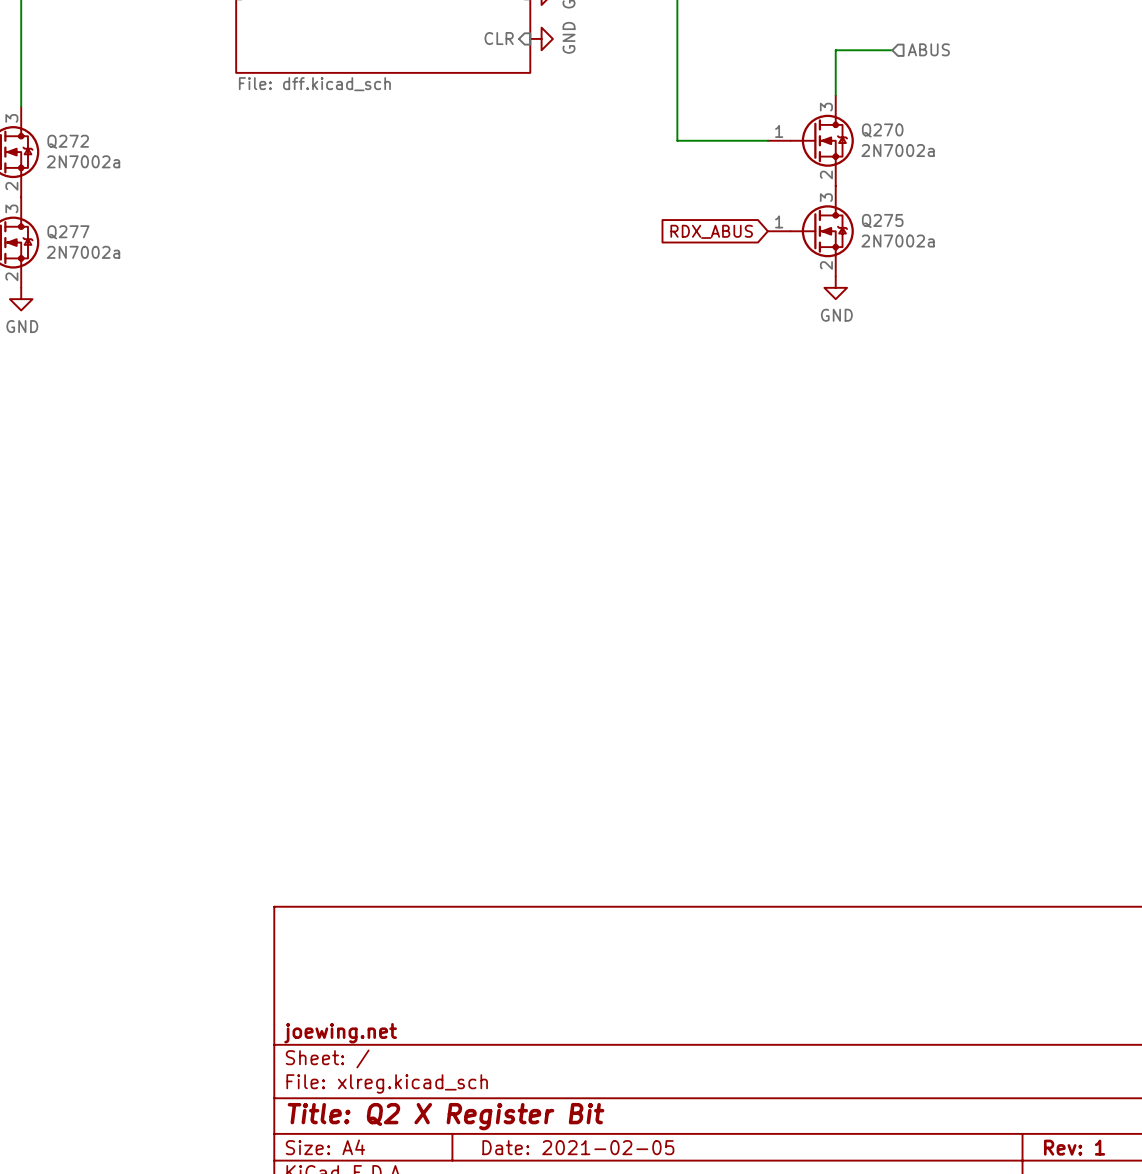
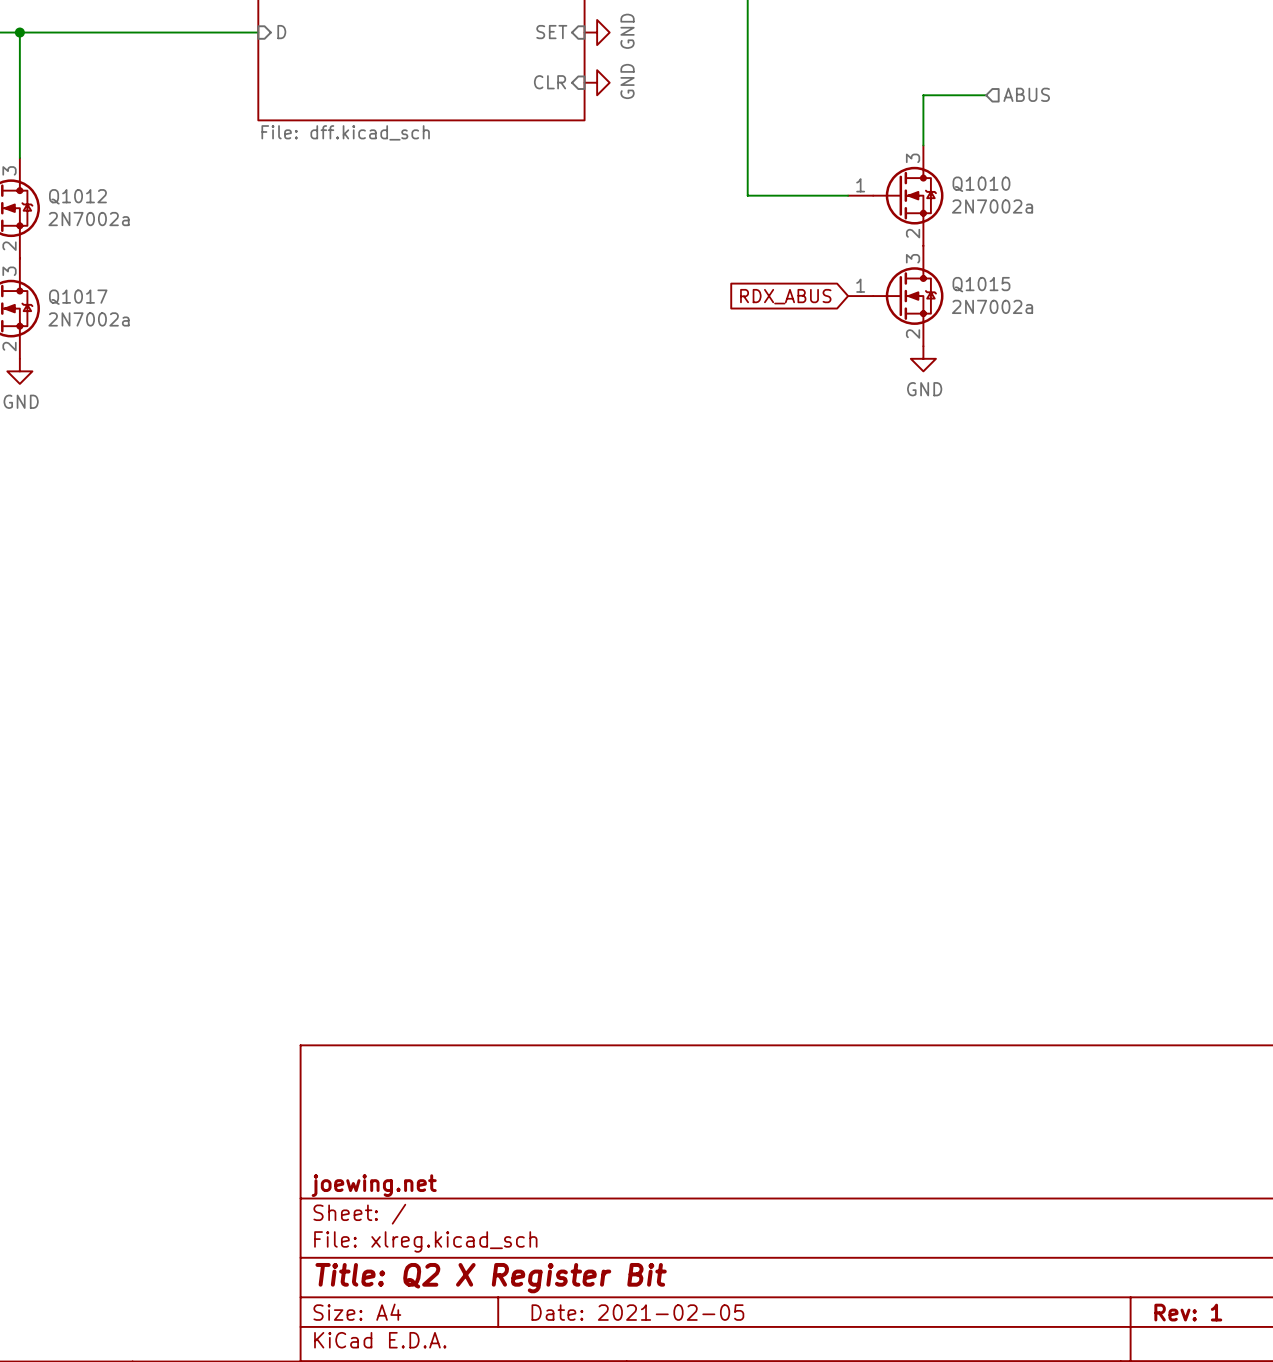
Q270 name: Q270 (882, 130) -> Q1010 (981, 184)
Q272 name: Q272 (68, 141) -> Q1012 (77, 196)
Q275 name: Q275 (882, 220) -> Q1015 (981, 284)
Q277 name: Q277 (68, 232) -> Q1017 (78, 297)

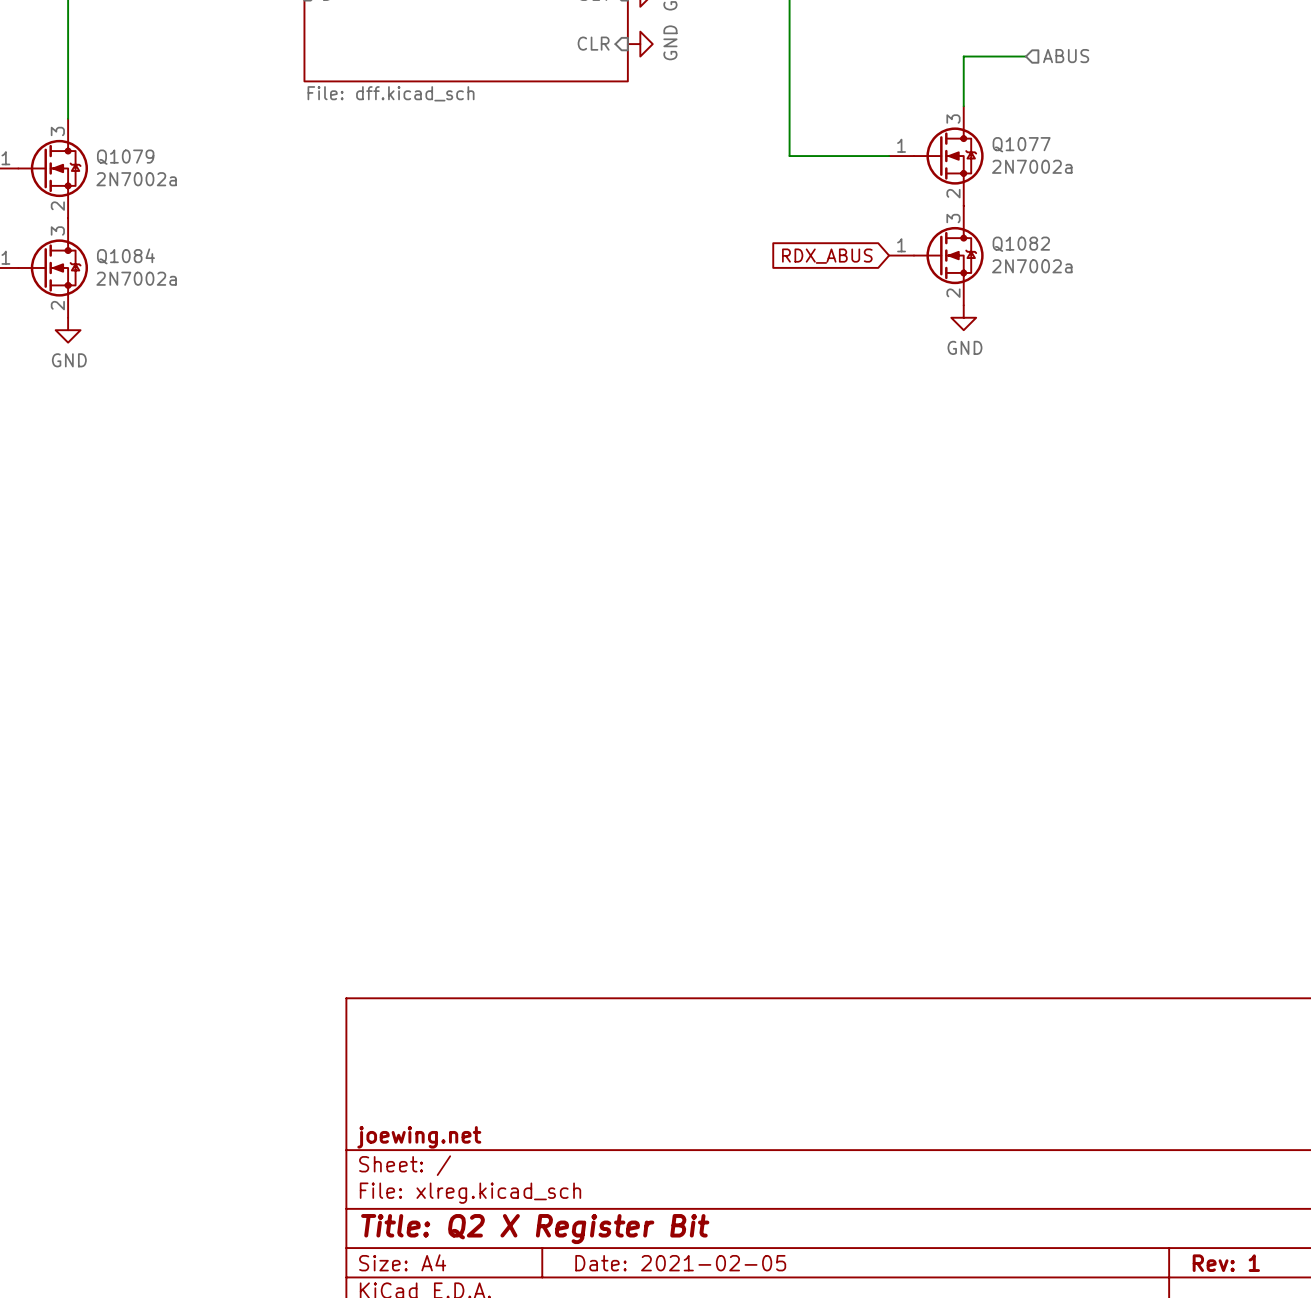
Q1010 name: Q1010 (981, 184) -> Q1077 (1021, 144)
Q1012 name: Q1012 (77, 196) -> Q1079 (125, 157)
Q1015 name: Q1015 (981, 284) -> Q1082 (1021, 244)
Q1017 name: Q1017 (78, 297) -> Q1084 (125, 256)

